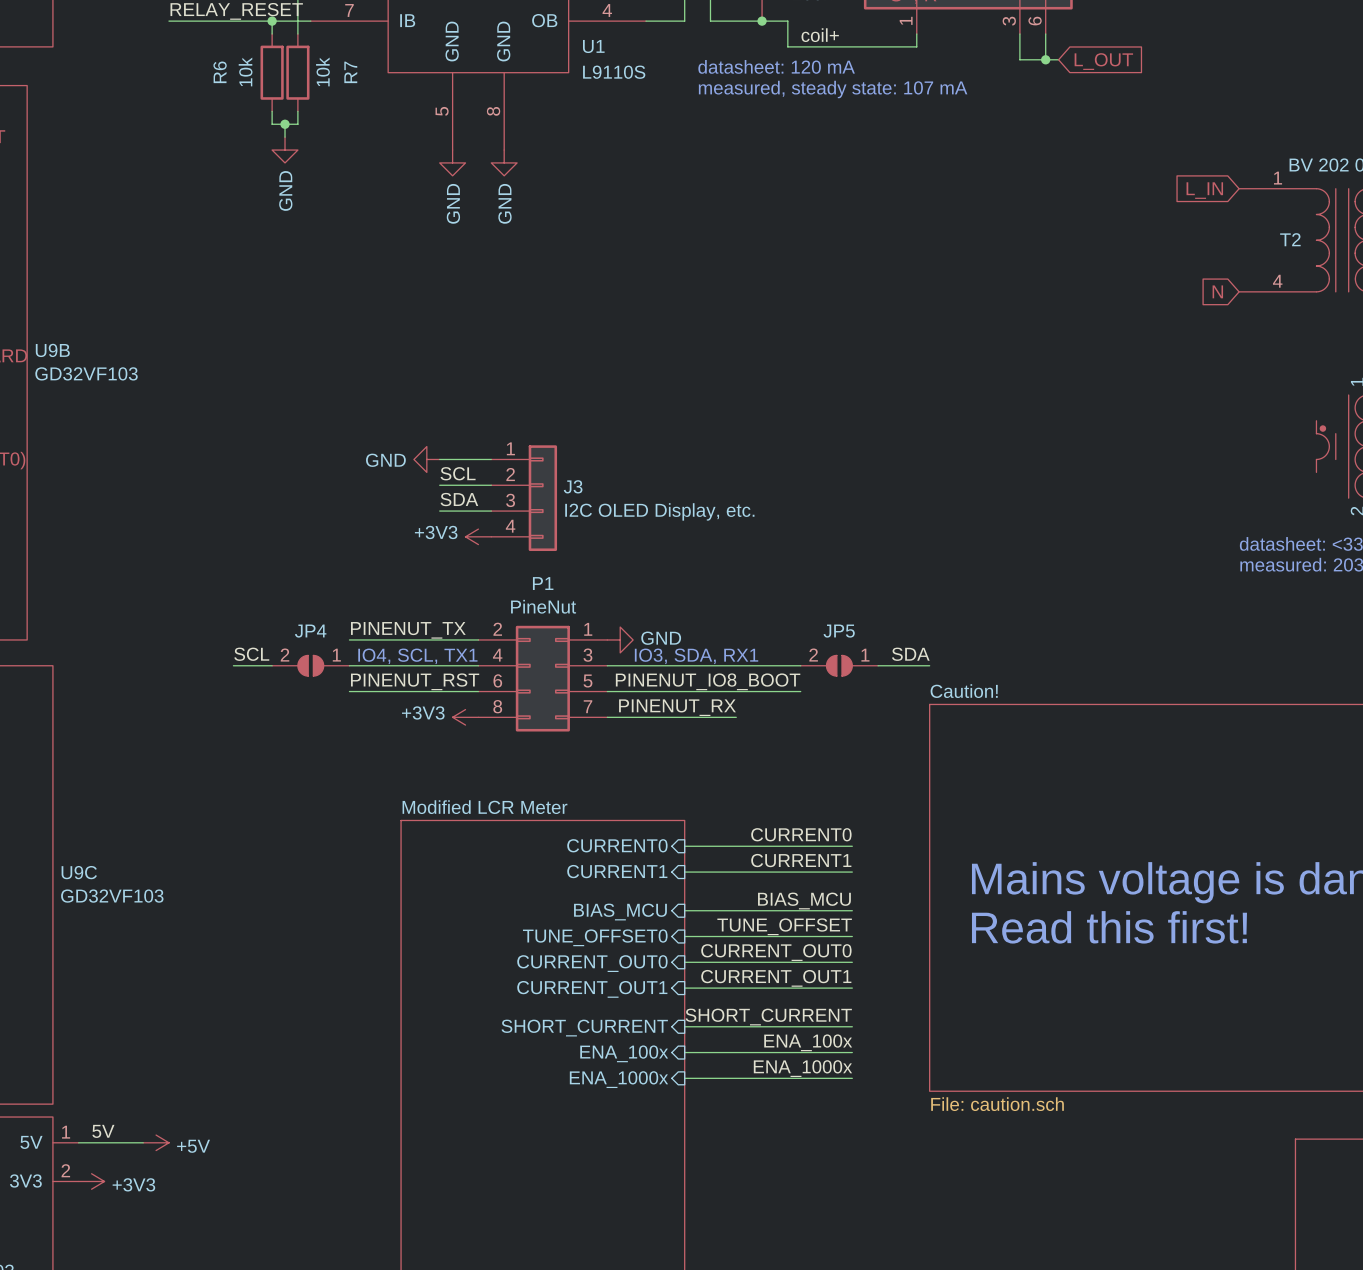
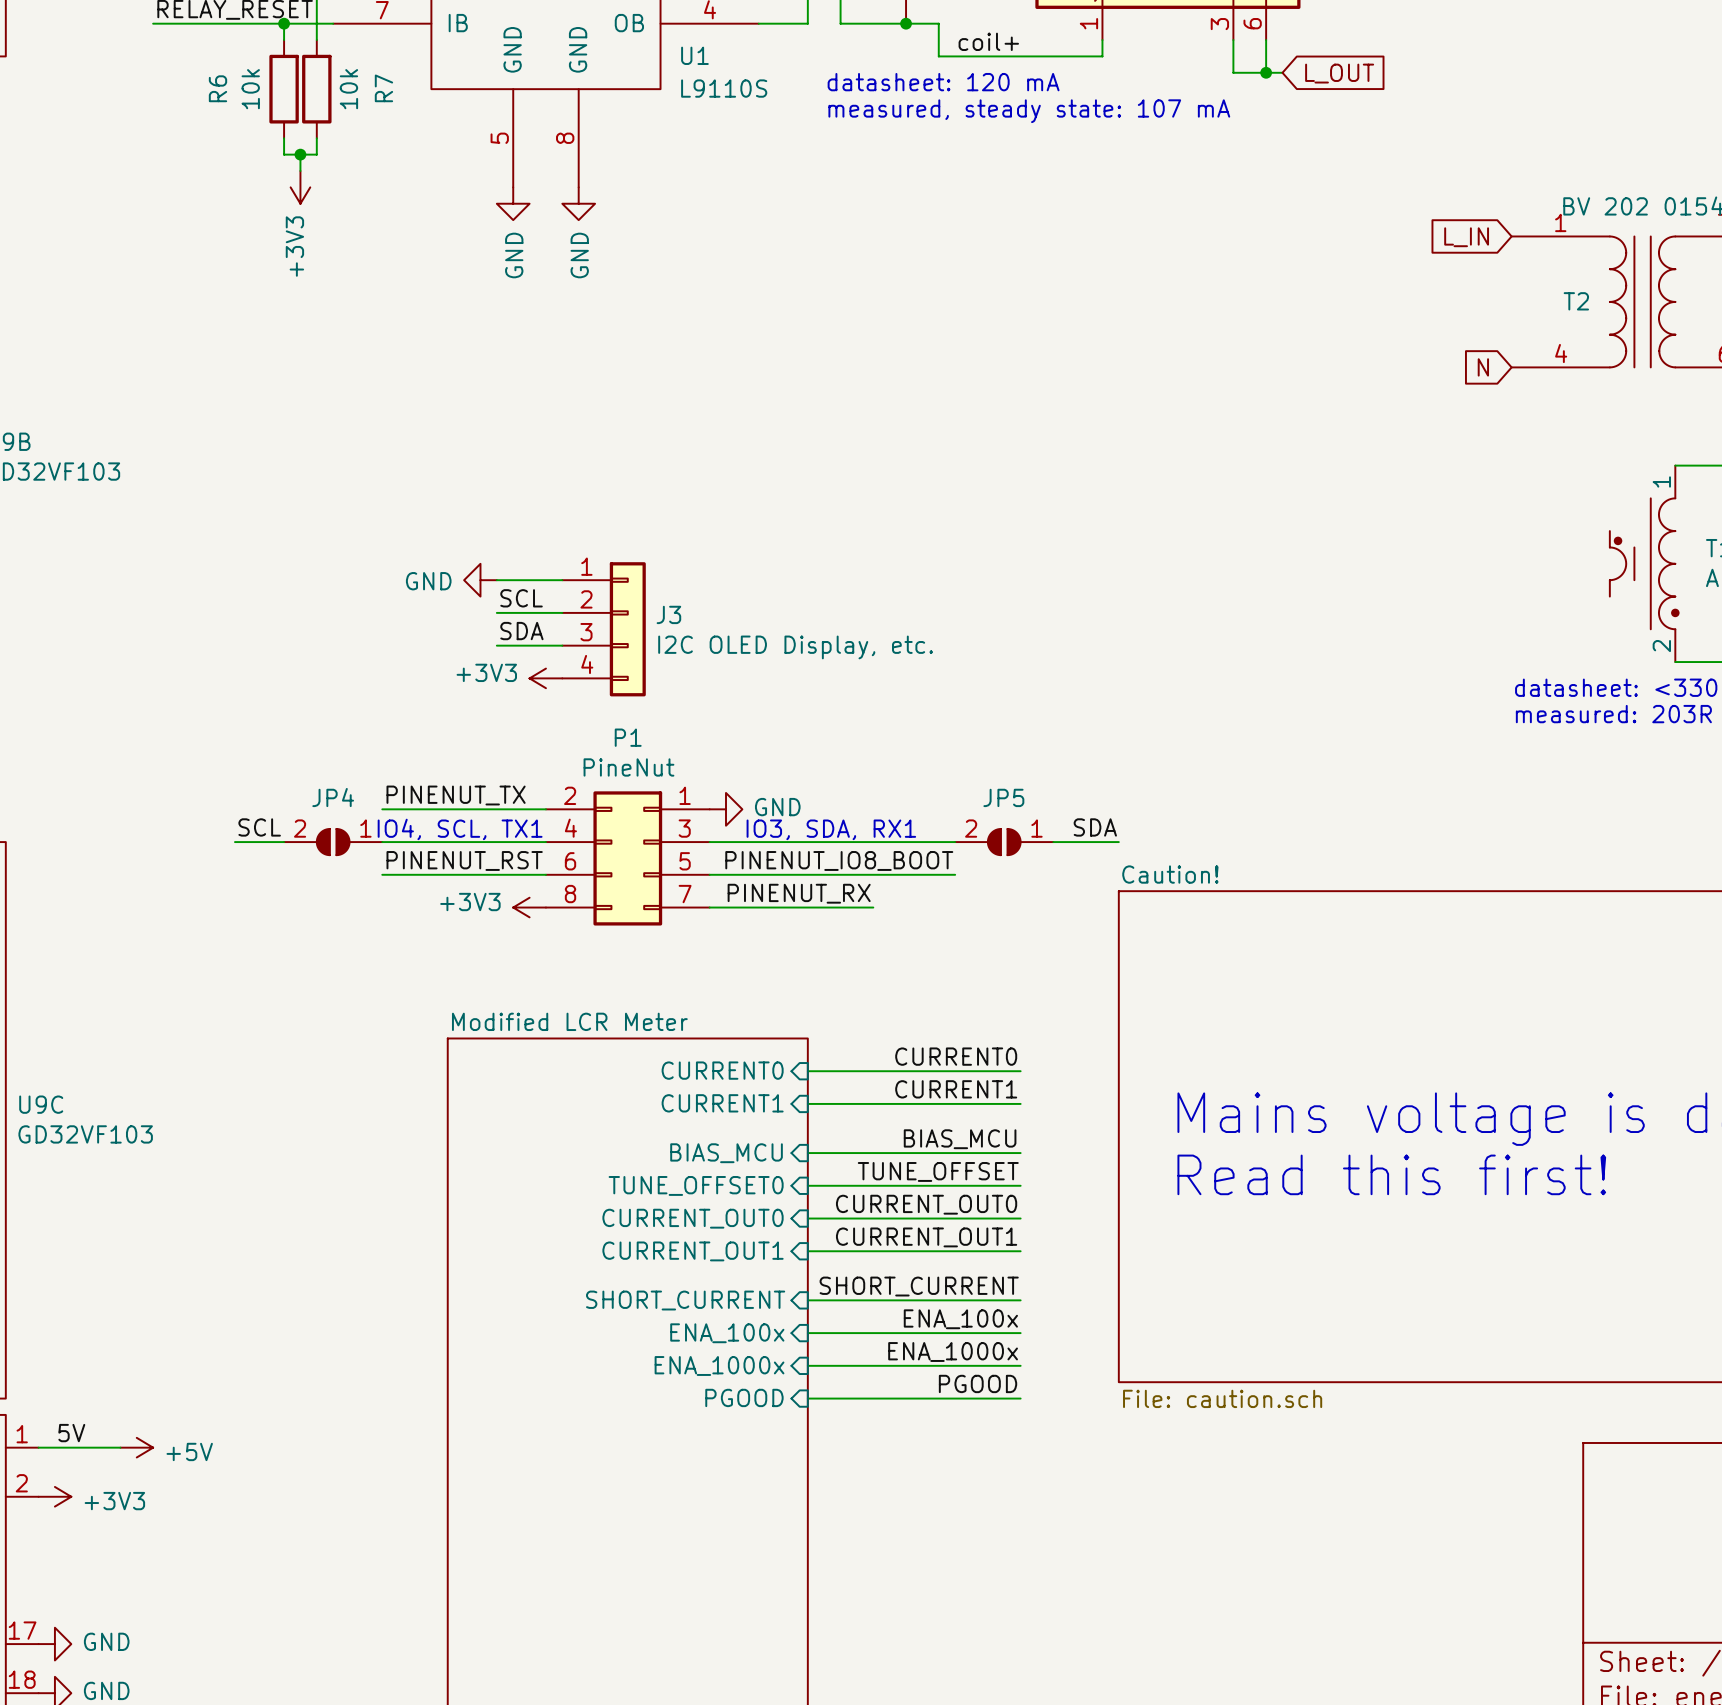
power symbol: GND (285, 150) -> +3V3 (300, 187)
label: none -> PGOOD (978, 1383)
sheet pin: none -> PGOOD (744, 1397)
wire: none -> (807, 1398) (1020, 1398)

